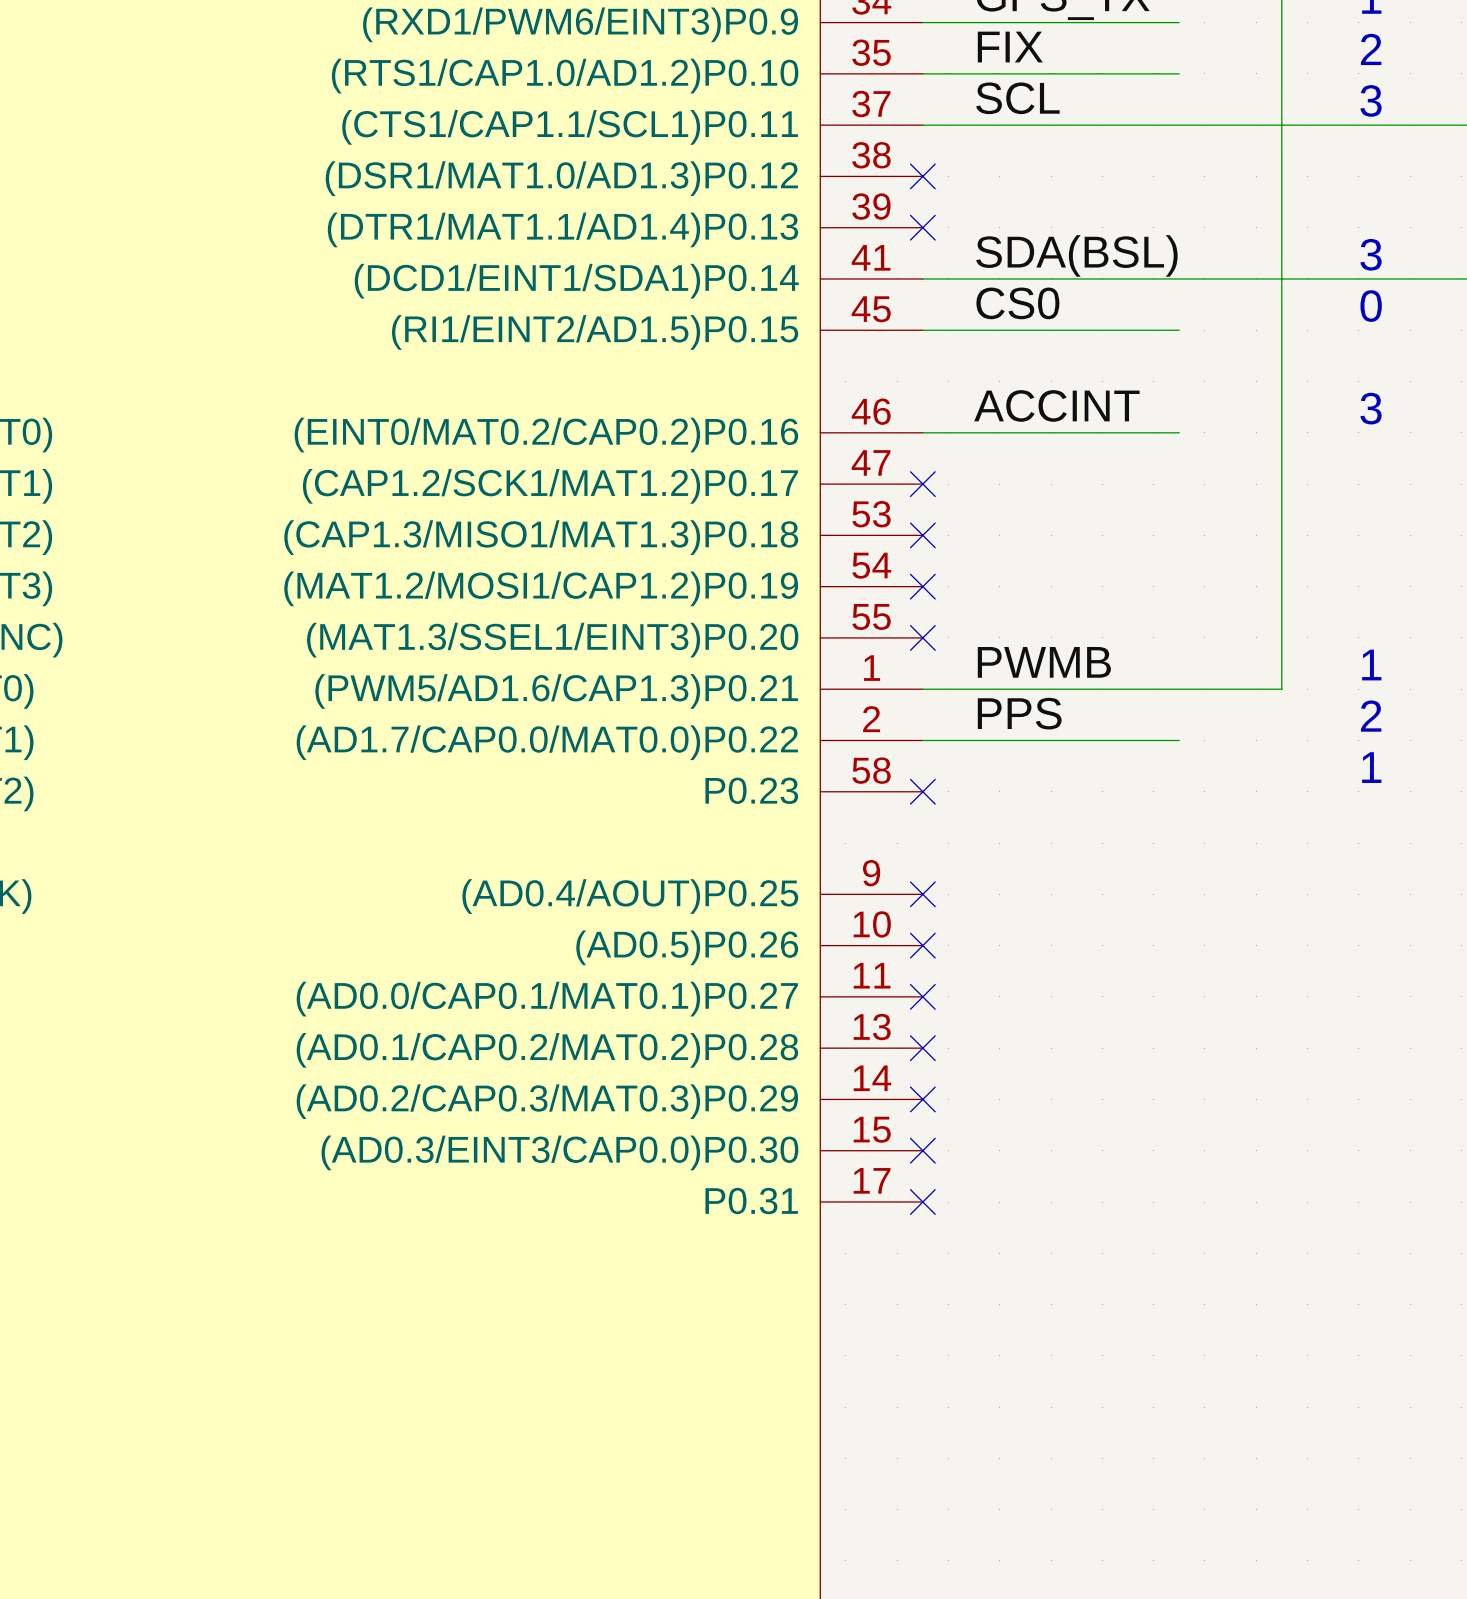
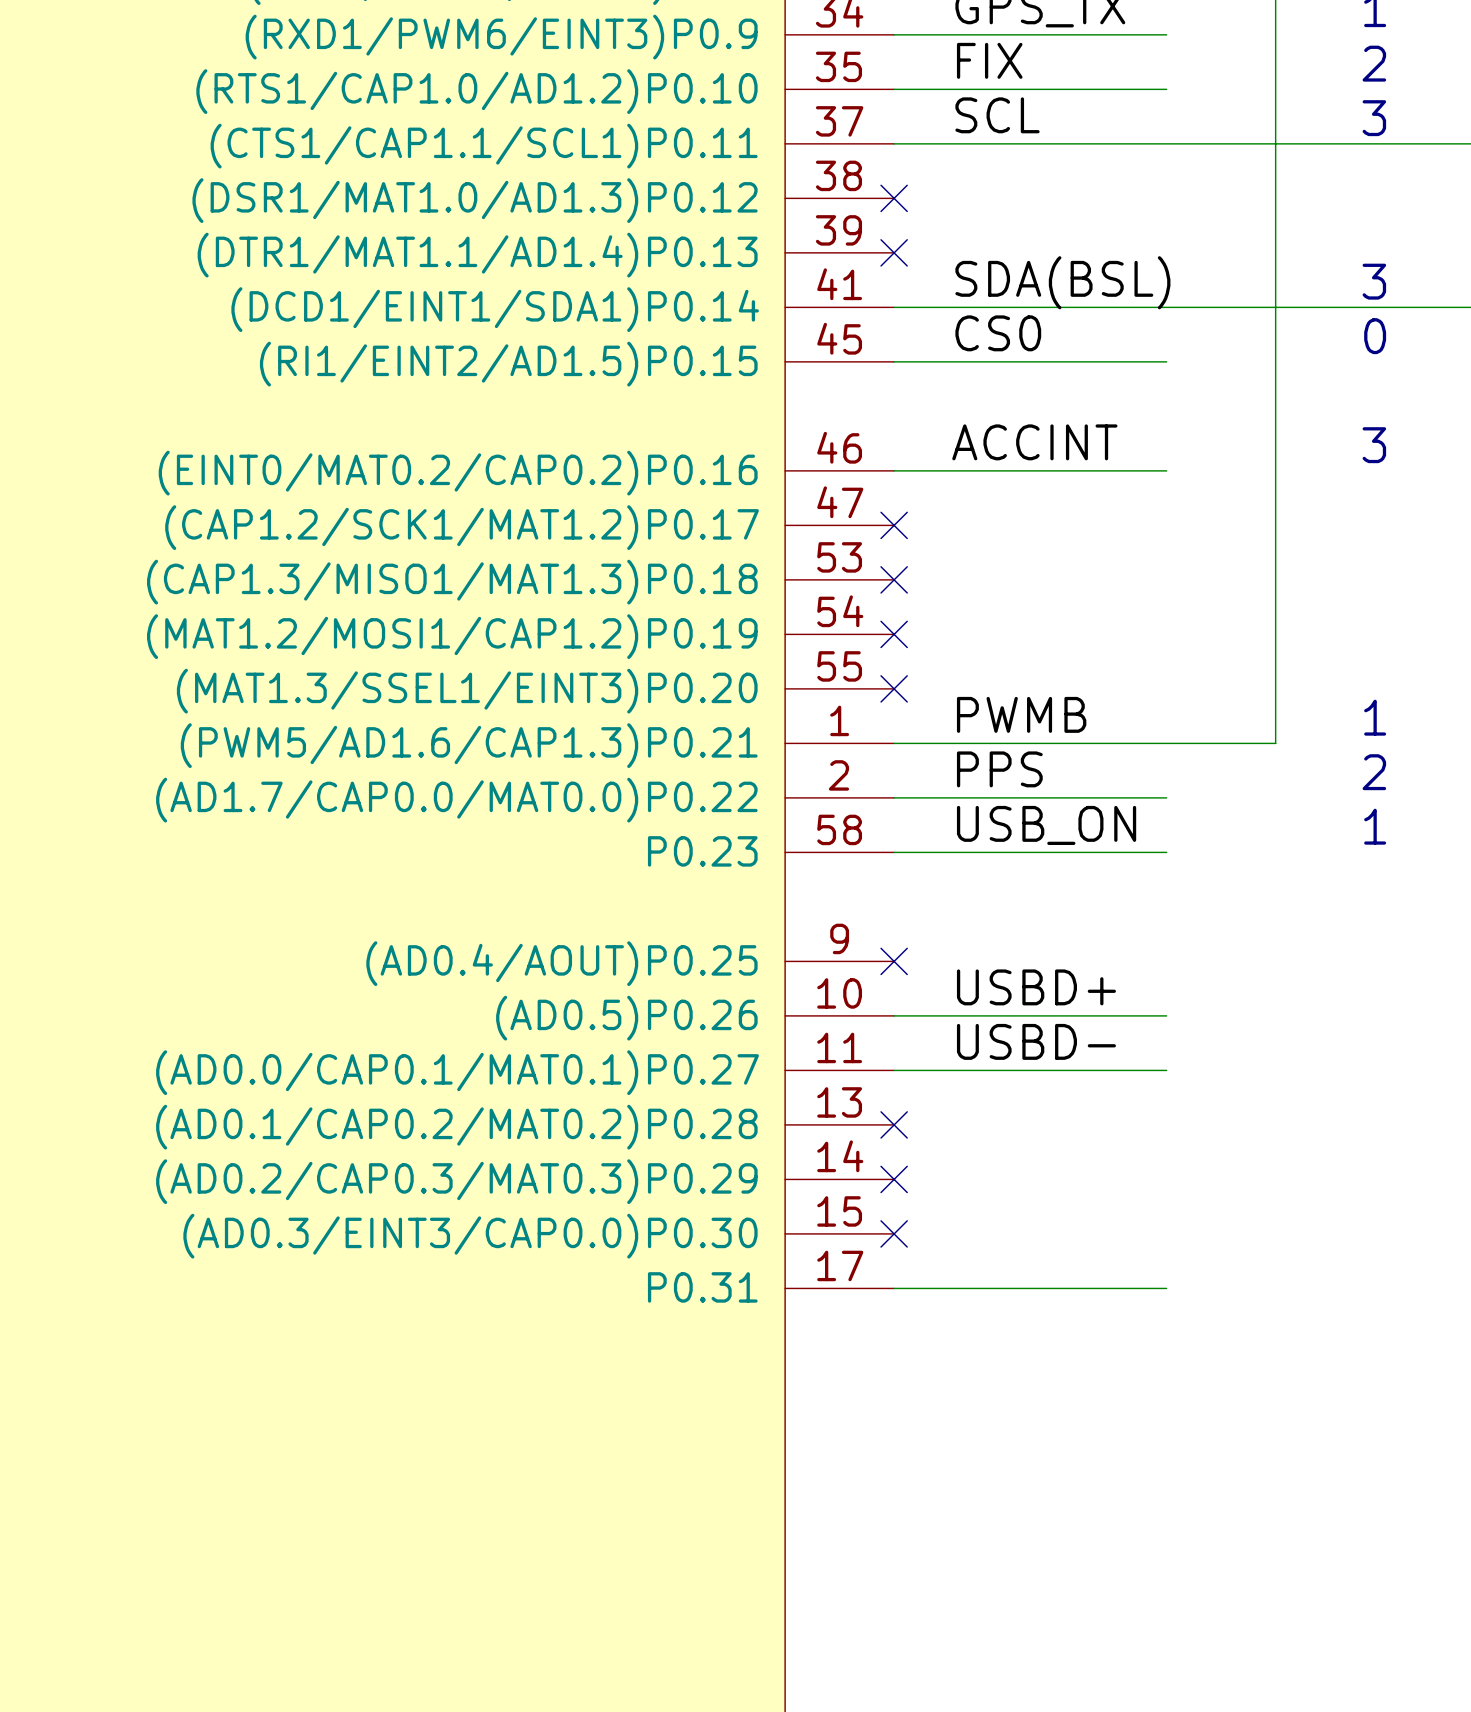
label: none -> USB_ON (1046, 825)
wire: none -> (894, 852) (1166, 852)
no-connect mark: (922, 791) -> none
label: none -> USBD+ (1036, 987)
wire: none -> (894, 1015) (1166, 1015)
no-connect mark: (922, 945) -> none
label: none -> USBD- (1036, 1041)
wire: none -> (894, 1070) (1166, 1070)
no-connect mark: (922, 996) -> none
wire: none -> (894, 1288) (1166, 1288)
no-connect mark: (922, 1202) -> none

